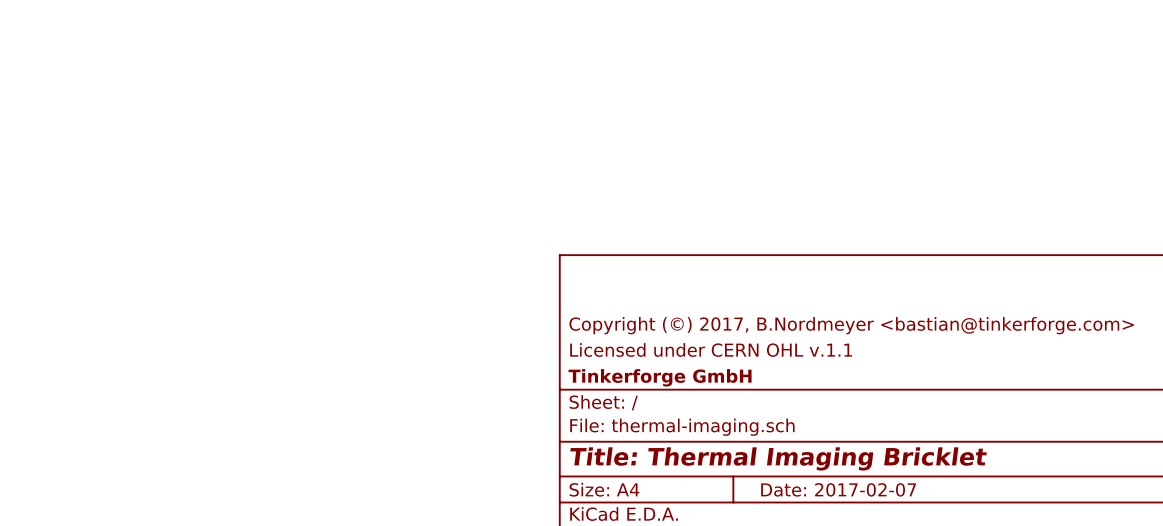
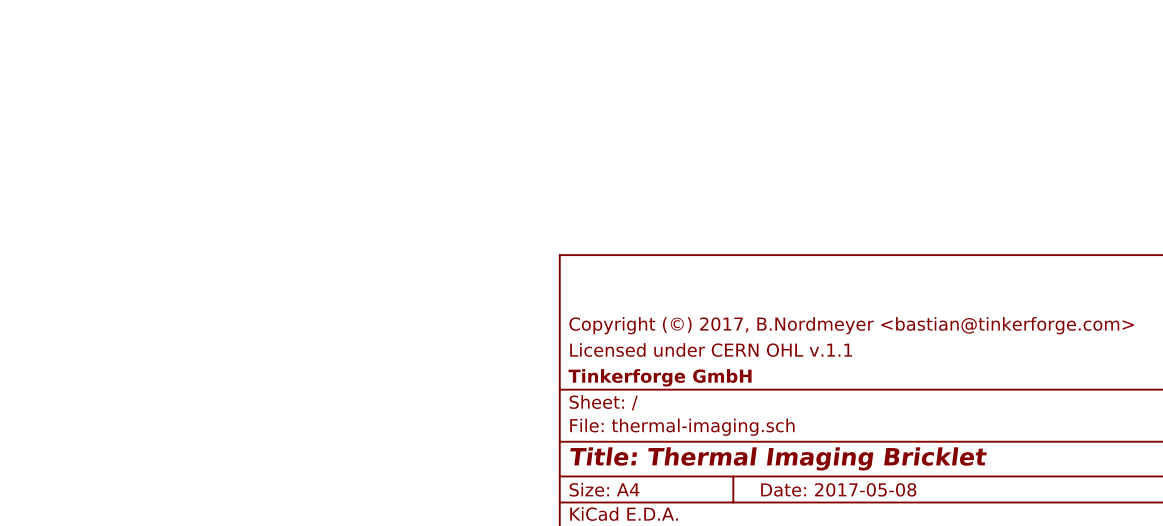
title block: Date: 2017-02-07 (838, 489) -> Date: 2017-05-08 (838, 489)

